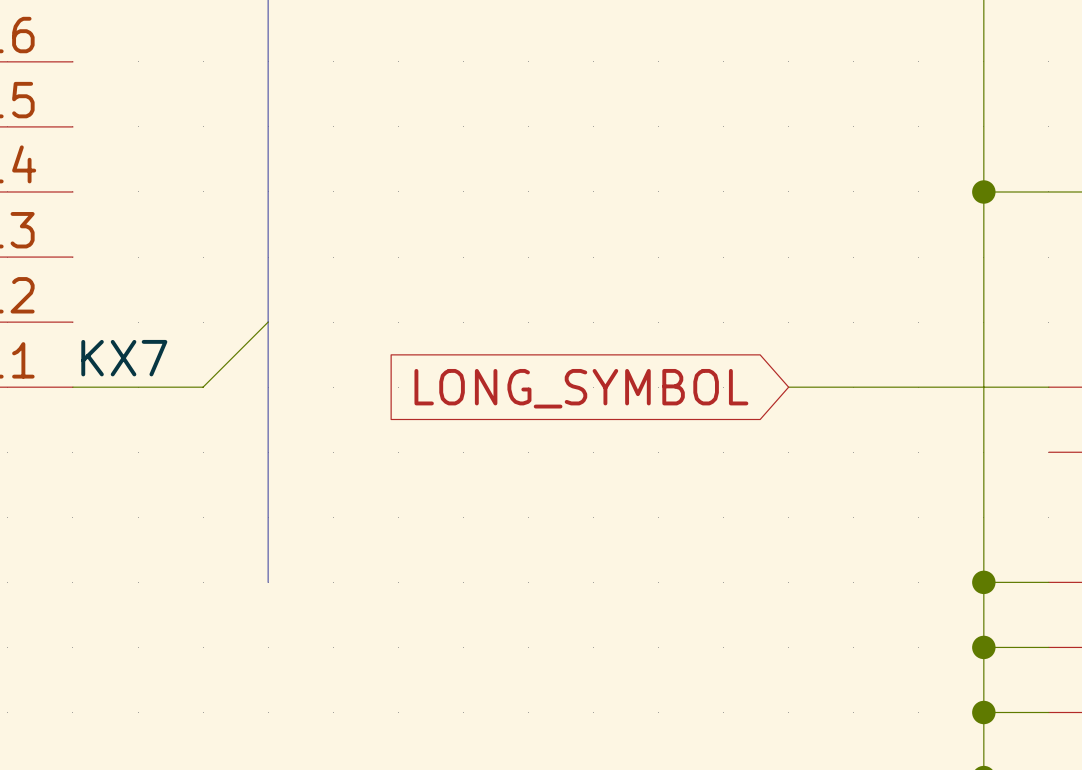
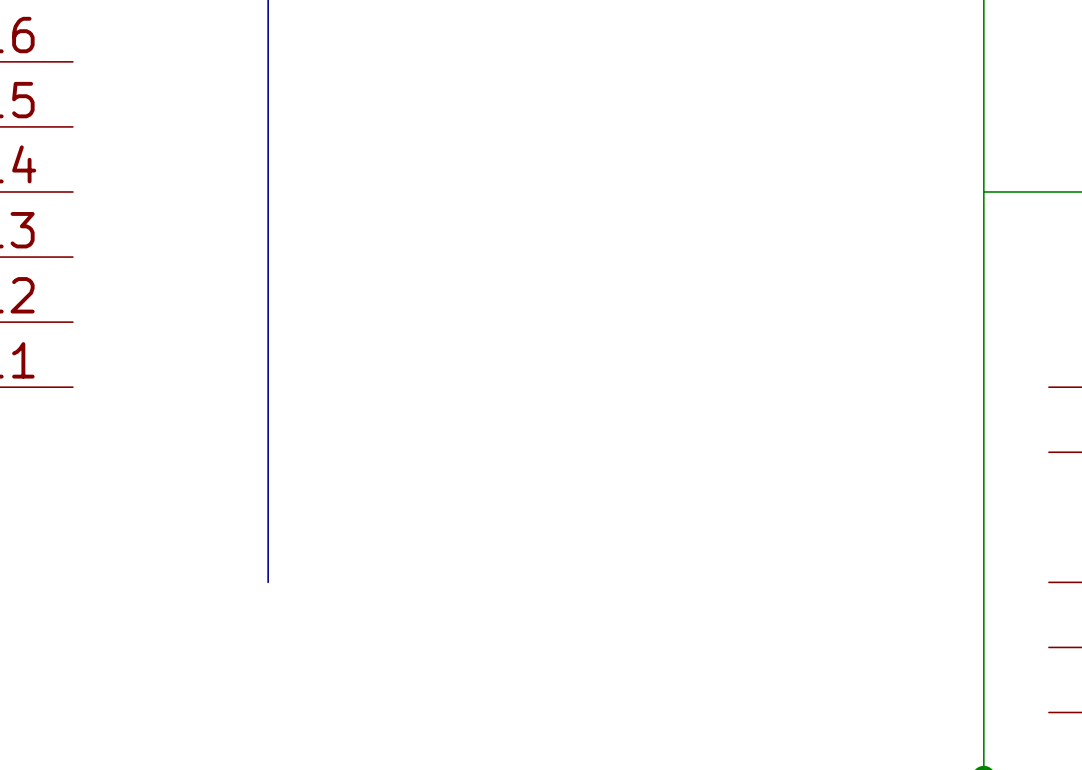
junction: (983, 191) -> none
wire: (268, 322) (203, 387) (72, 387) -> none
label: KX7 (124, 358) -> none
wire: (788, 387) (1048, 387) -> none
global label: LONG_SYMBOL (581, 388) -> none
wire: (983, 582) (1048, 582) -> none
junction: (983, 582) -> none
wire: (983, 647) (1048, 647) -> none
junction: (983, 647) -> none
wire: (983, 712) (1048, 712) -> none
junction: (983, 712) -> none

